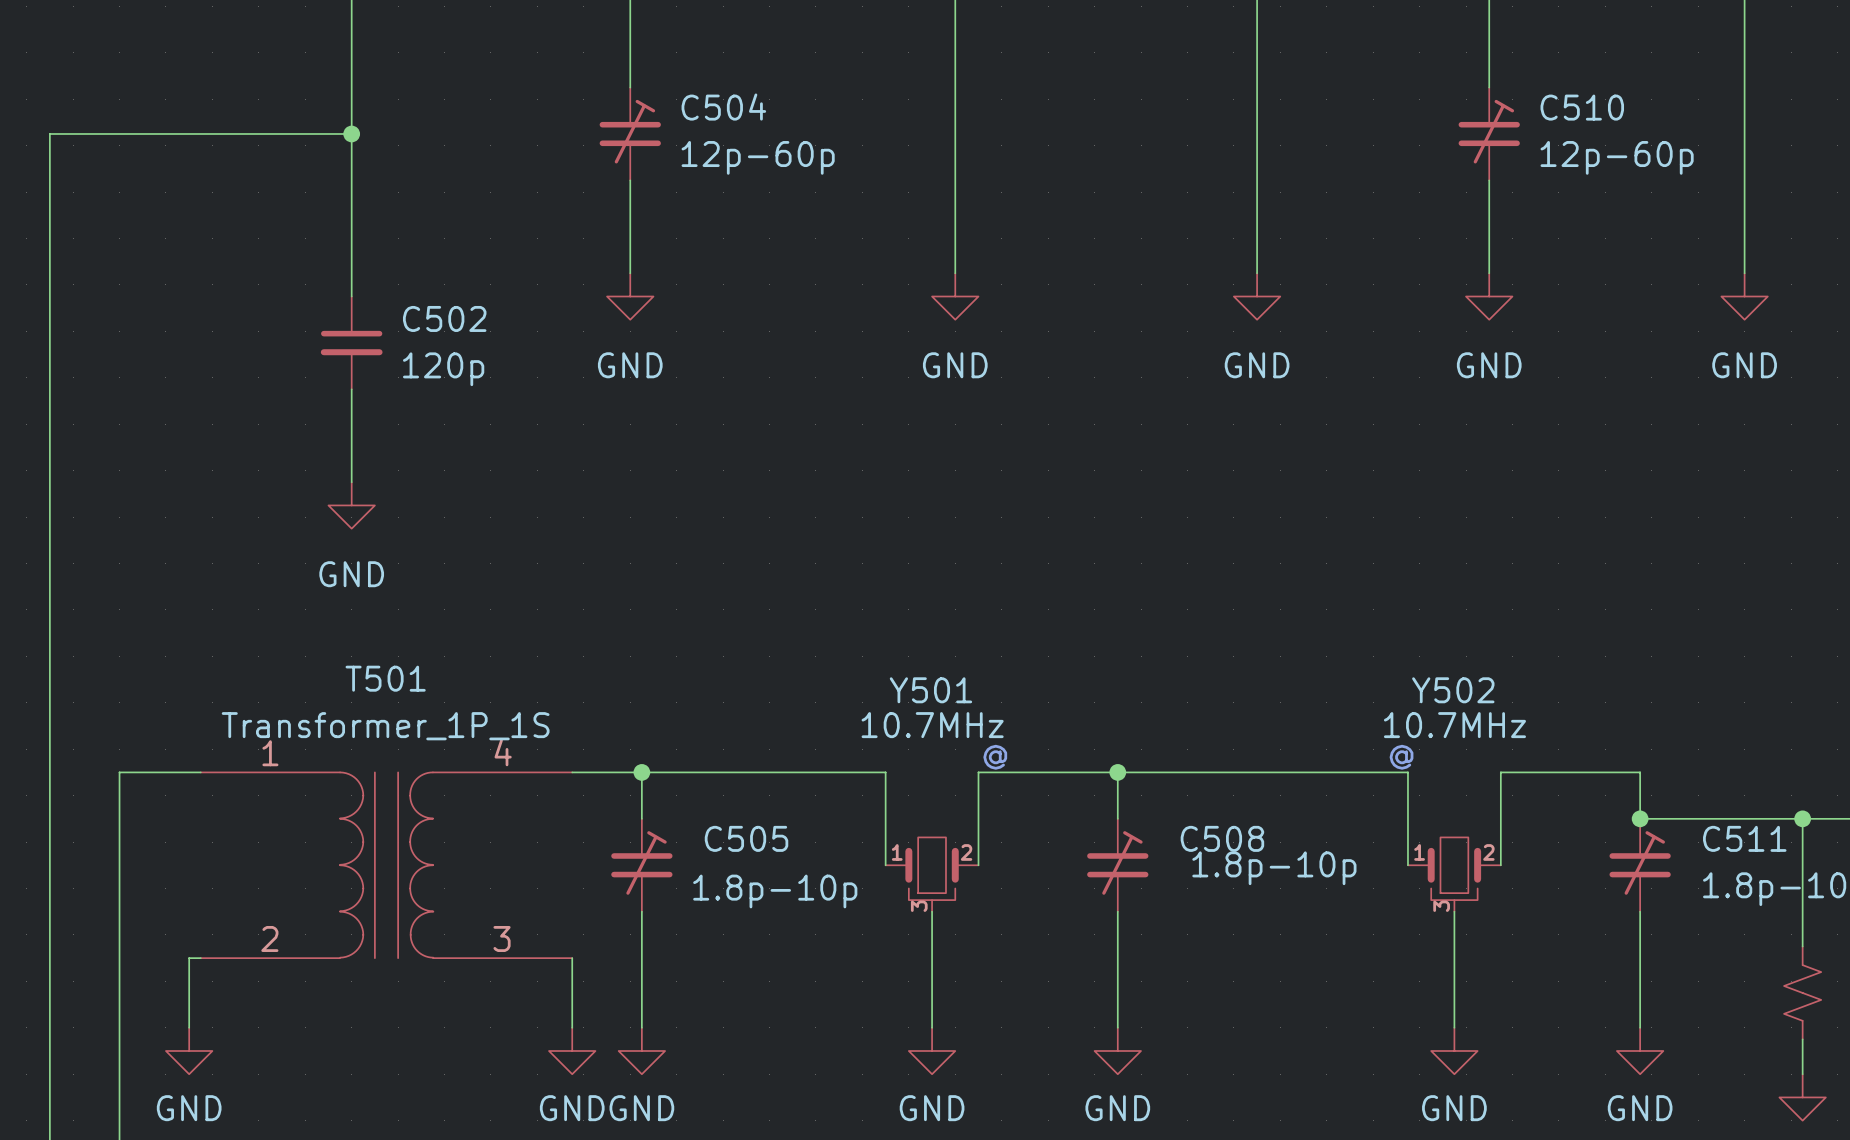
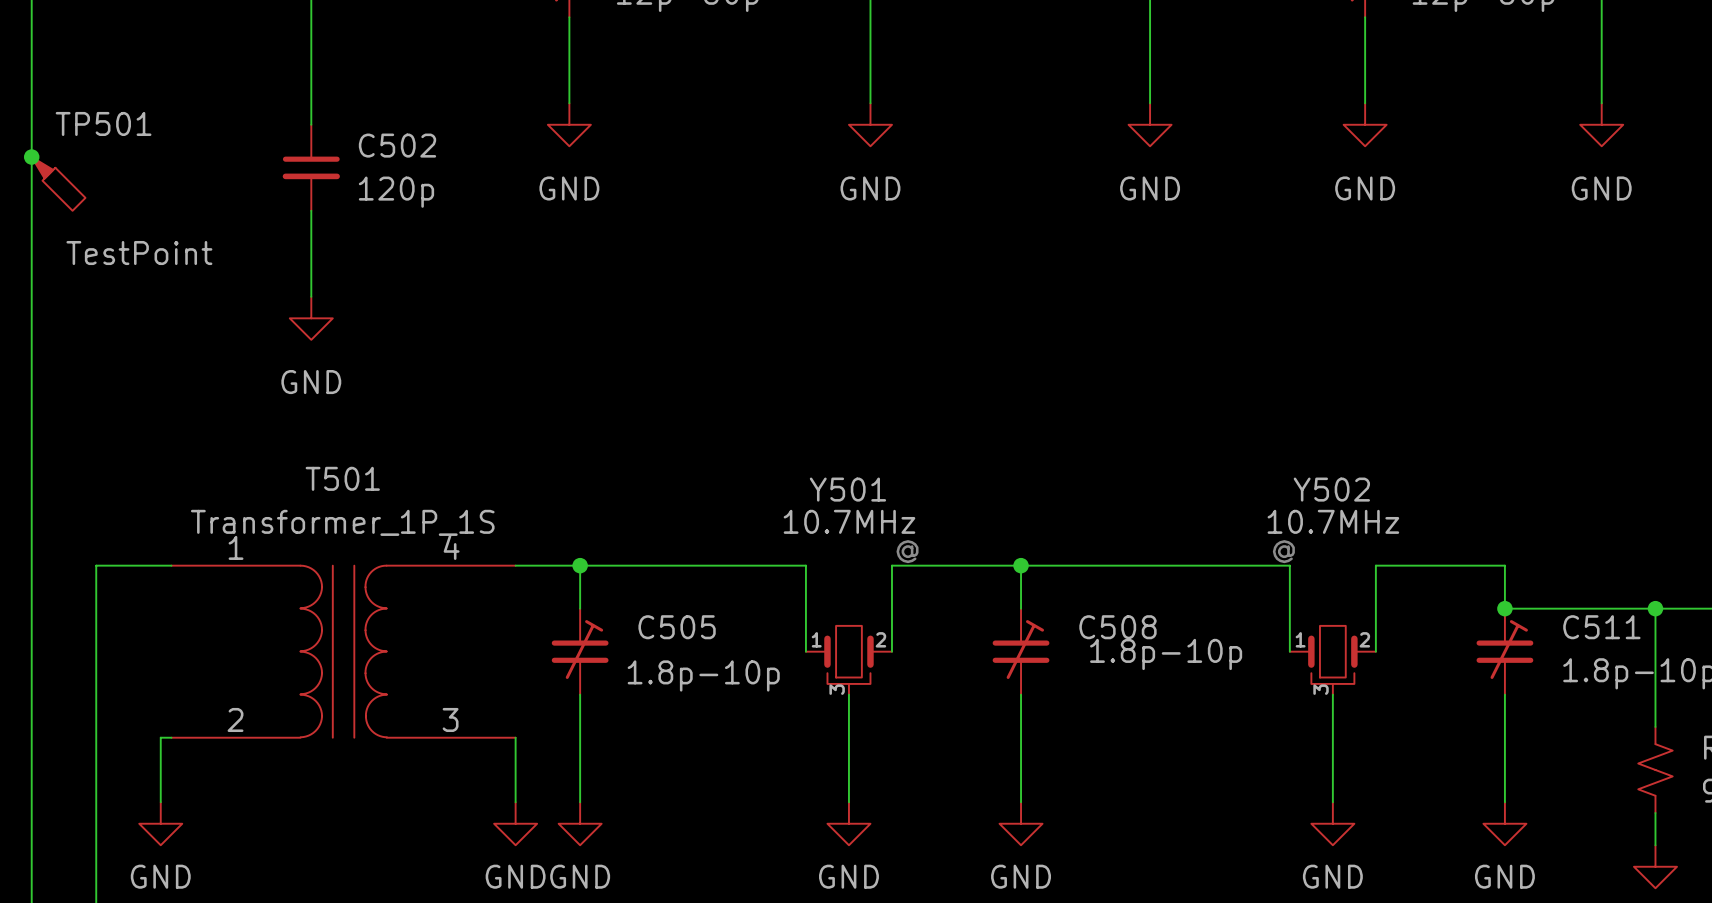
junction: none -> (31, 157)
TP501: none -> TestPoint (58, 183)

